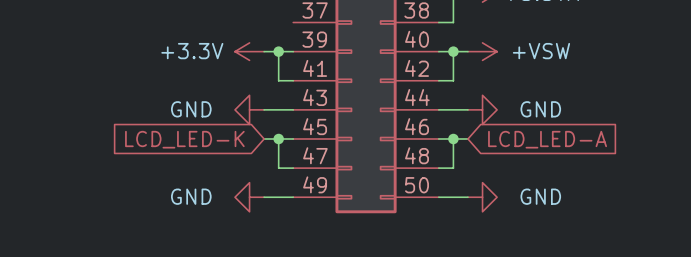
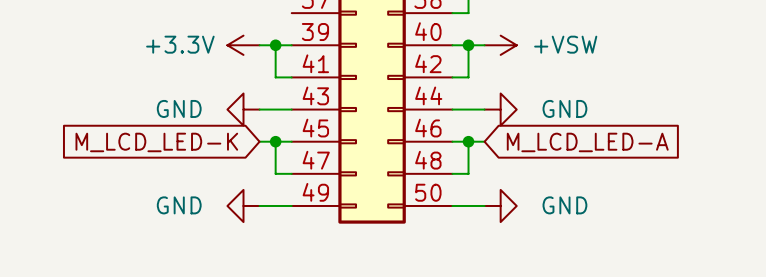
global label: LCD_LED-K (184, 139) -> M_LCD_LED-K (156, 142)
global label: LCD_LED-A (547, 139) -> M_LCD_LED-A (587, 142)

